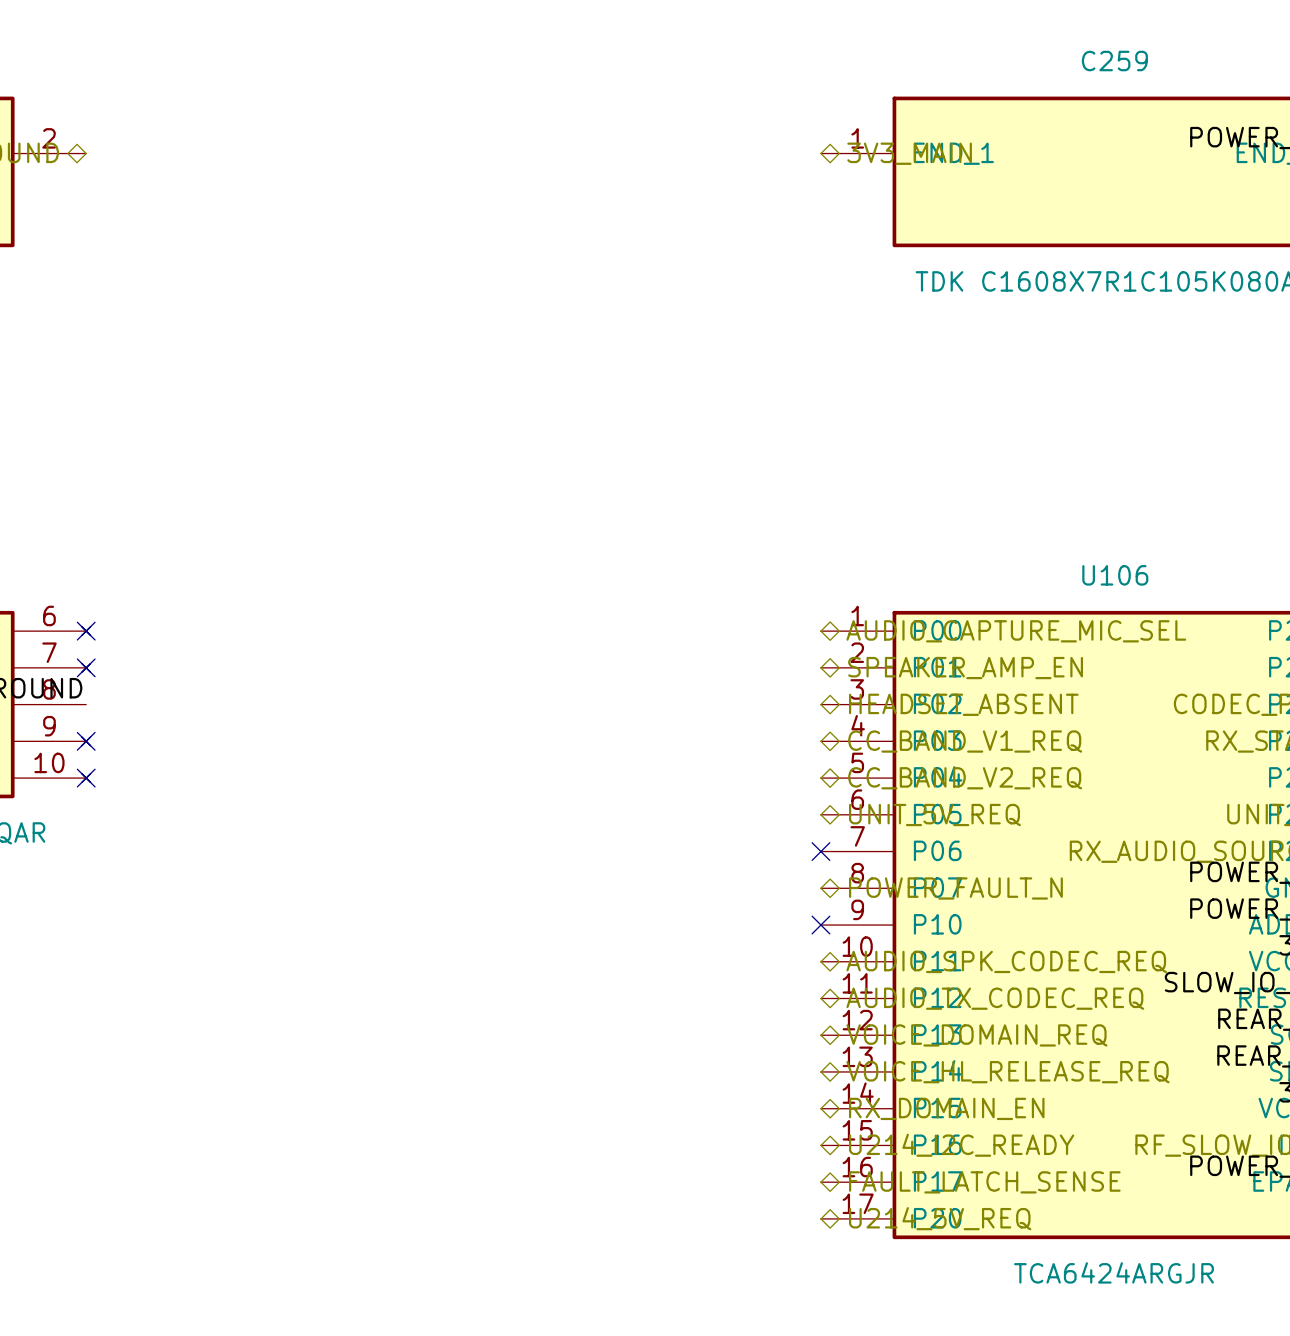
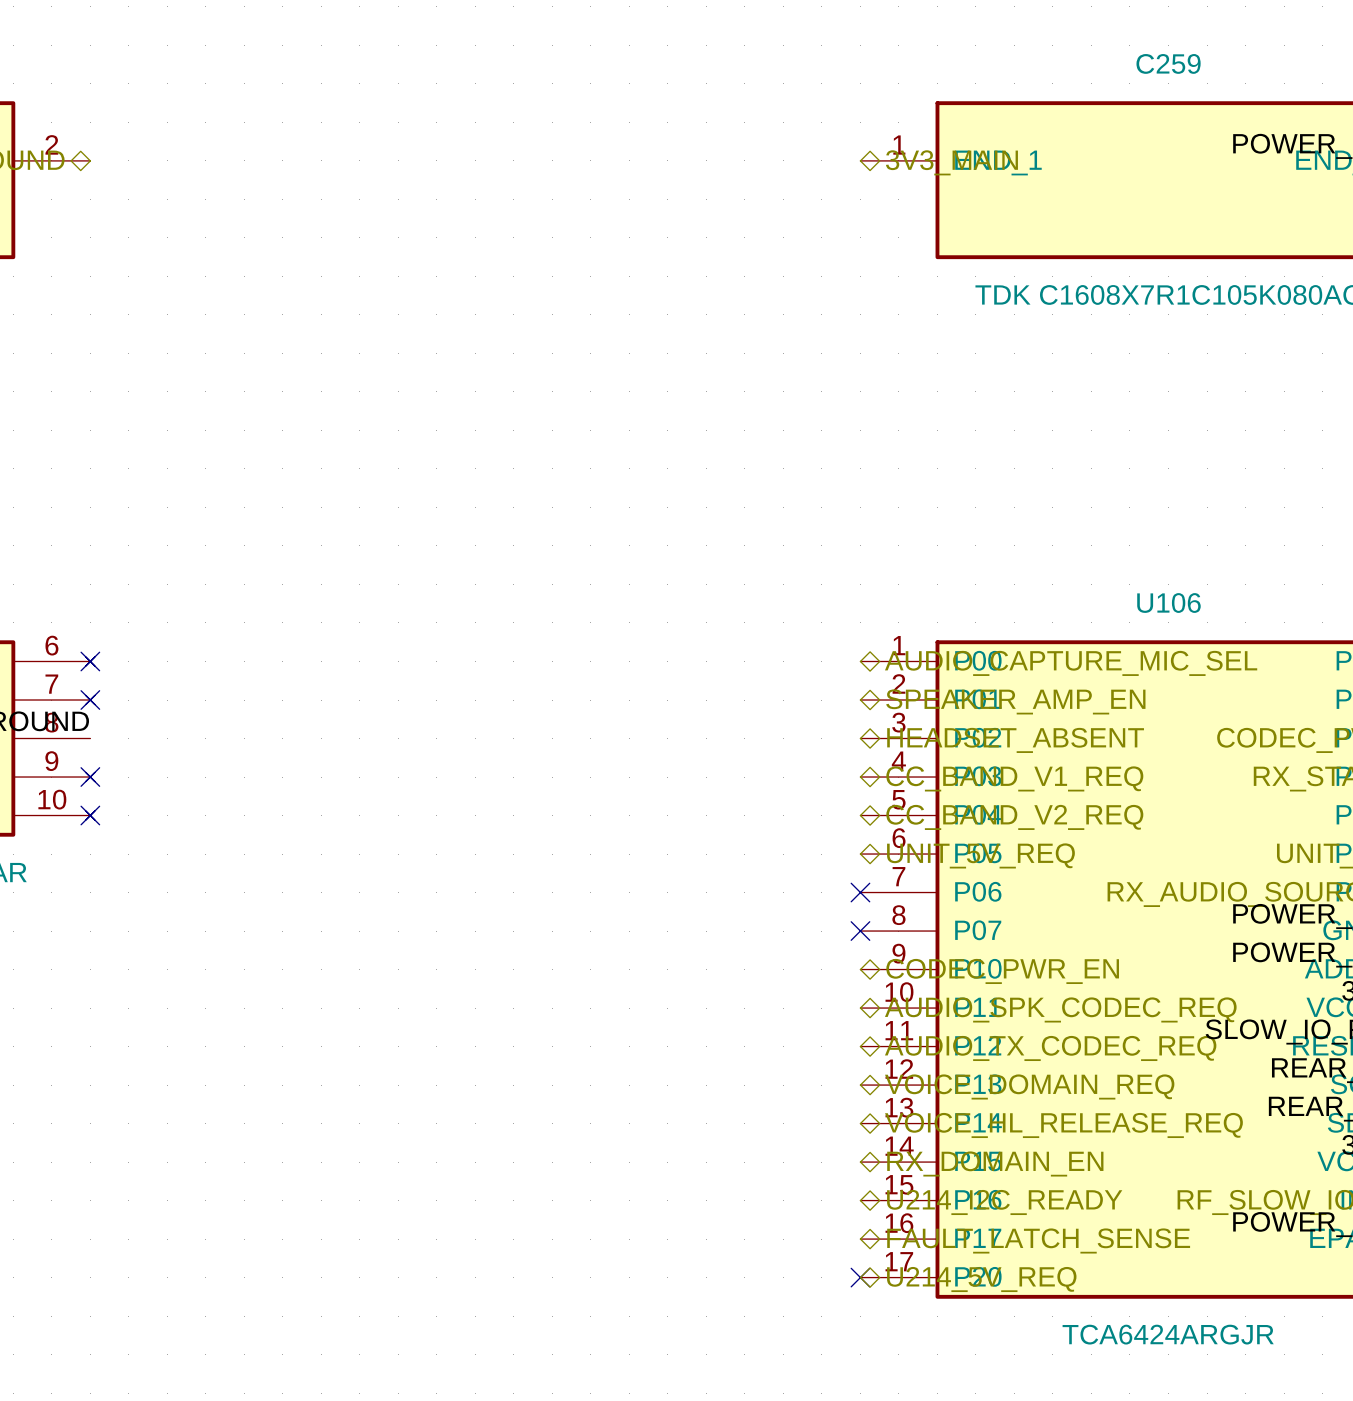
hierarchical label: POWER_FAULT_N (955, 888) -> none
no-connect mark position: (820, 925) -> (860, 931)
hierarchical label: none -> CODEC_PWR_EN (1002, 971)
no-connect mark: none -> (860, 1277)

